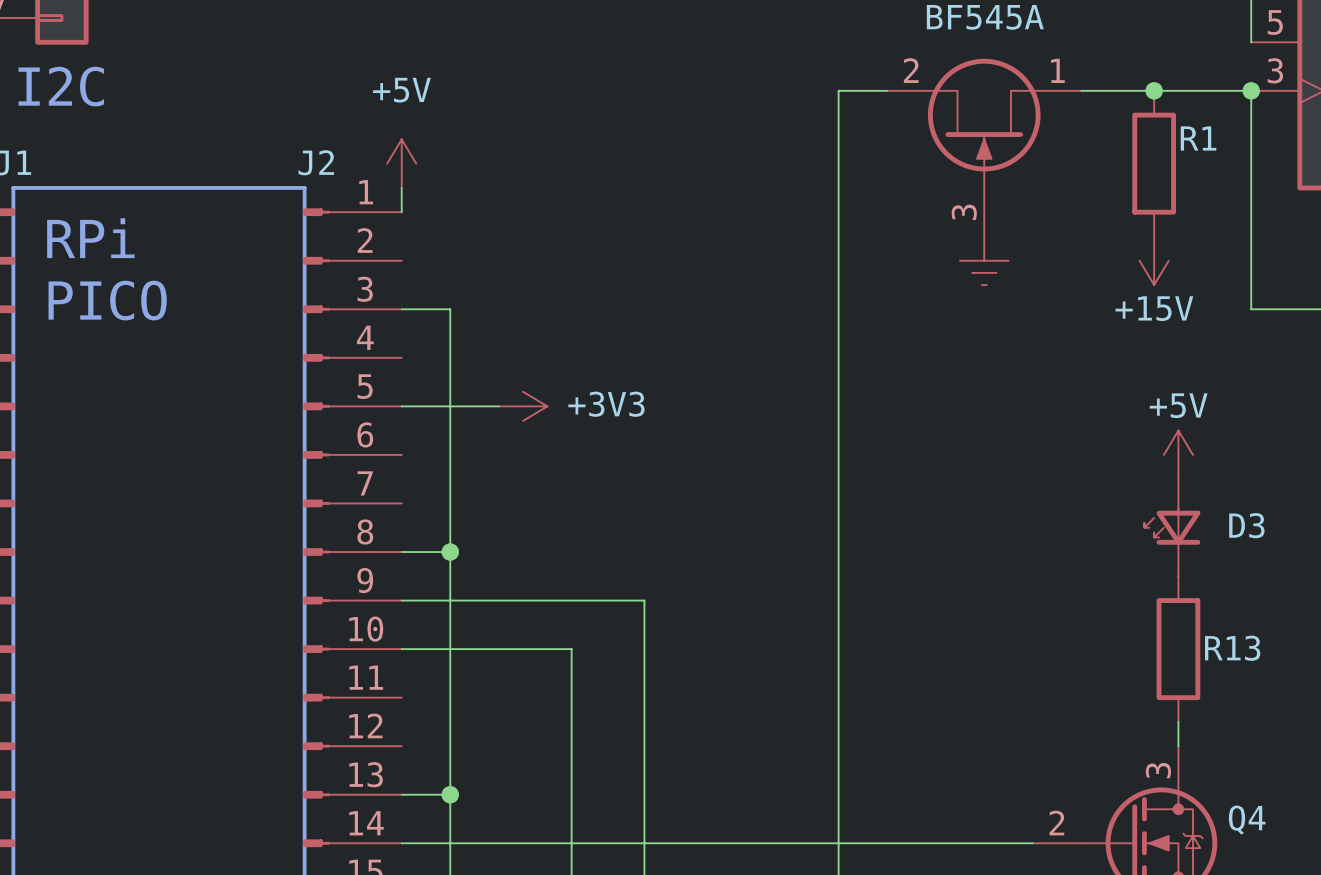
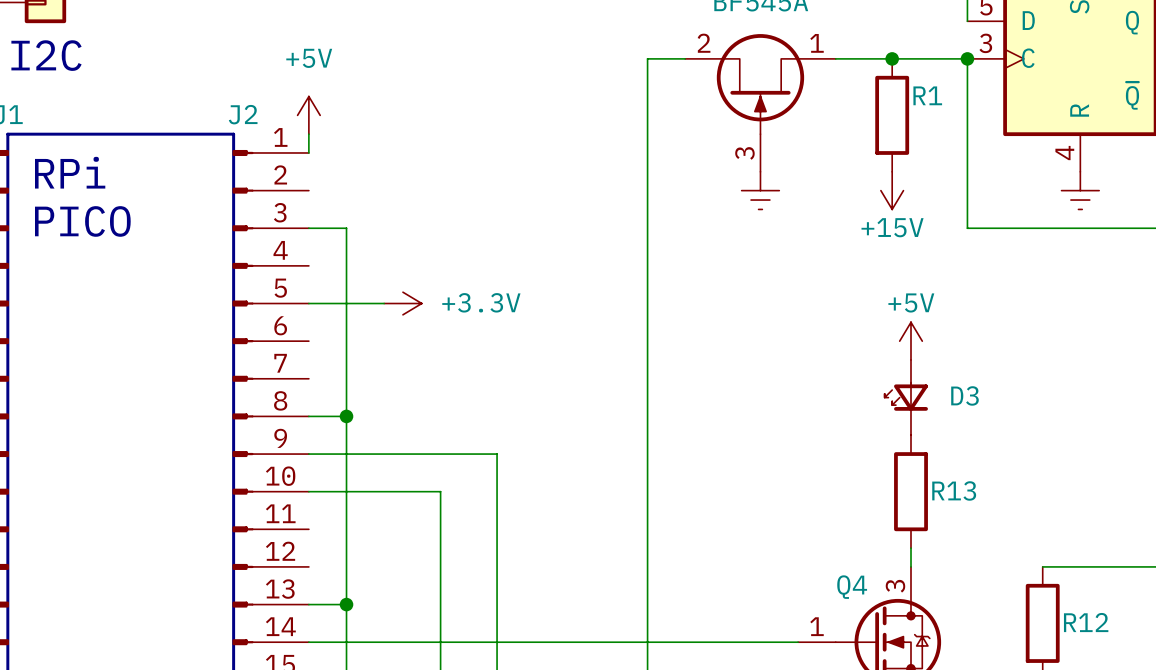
power symbol: +3V3 (523, 406) -> +3.3V (402, 303)
Q4 name position: Q4 (1247, 820) -> Q4 (852, 587)
Q4 pin number: 2 (1056, 823) -> 1 (817, 626)

